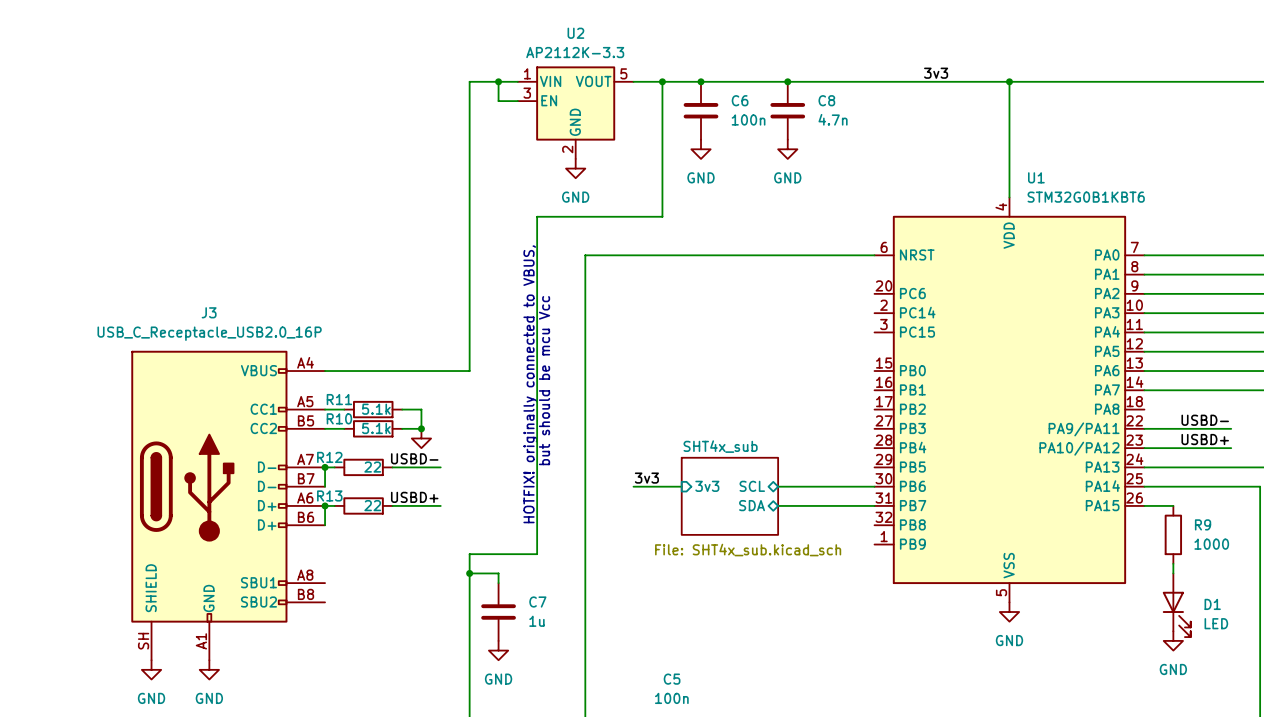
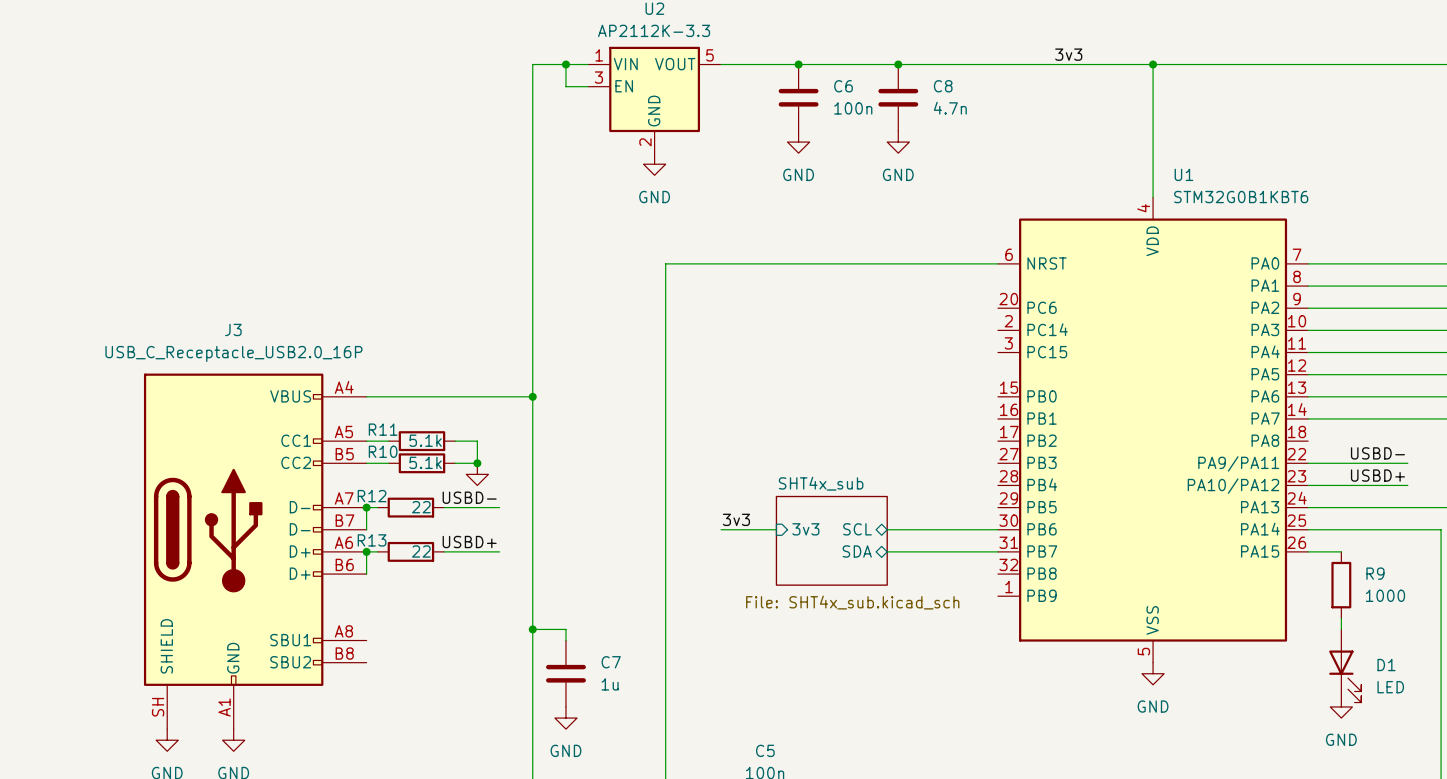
wire: (662, 81) (662, 216) (537, 216) (537, 554) (469, 554) -> (532, 396) (532, 607)
junction: (662, 81) -> none
junction: none -> (532, 396)
text: but should be mcu Vcc (544, 380) -> none
text: HOTFIX! originally connected to VBUS, (530, 384) -> none

